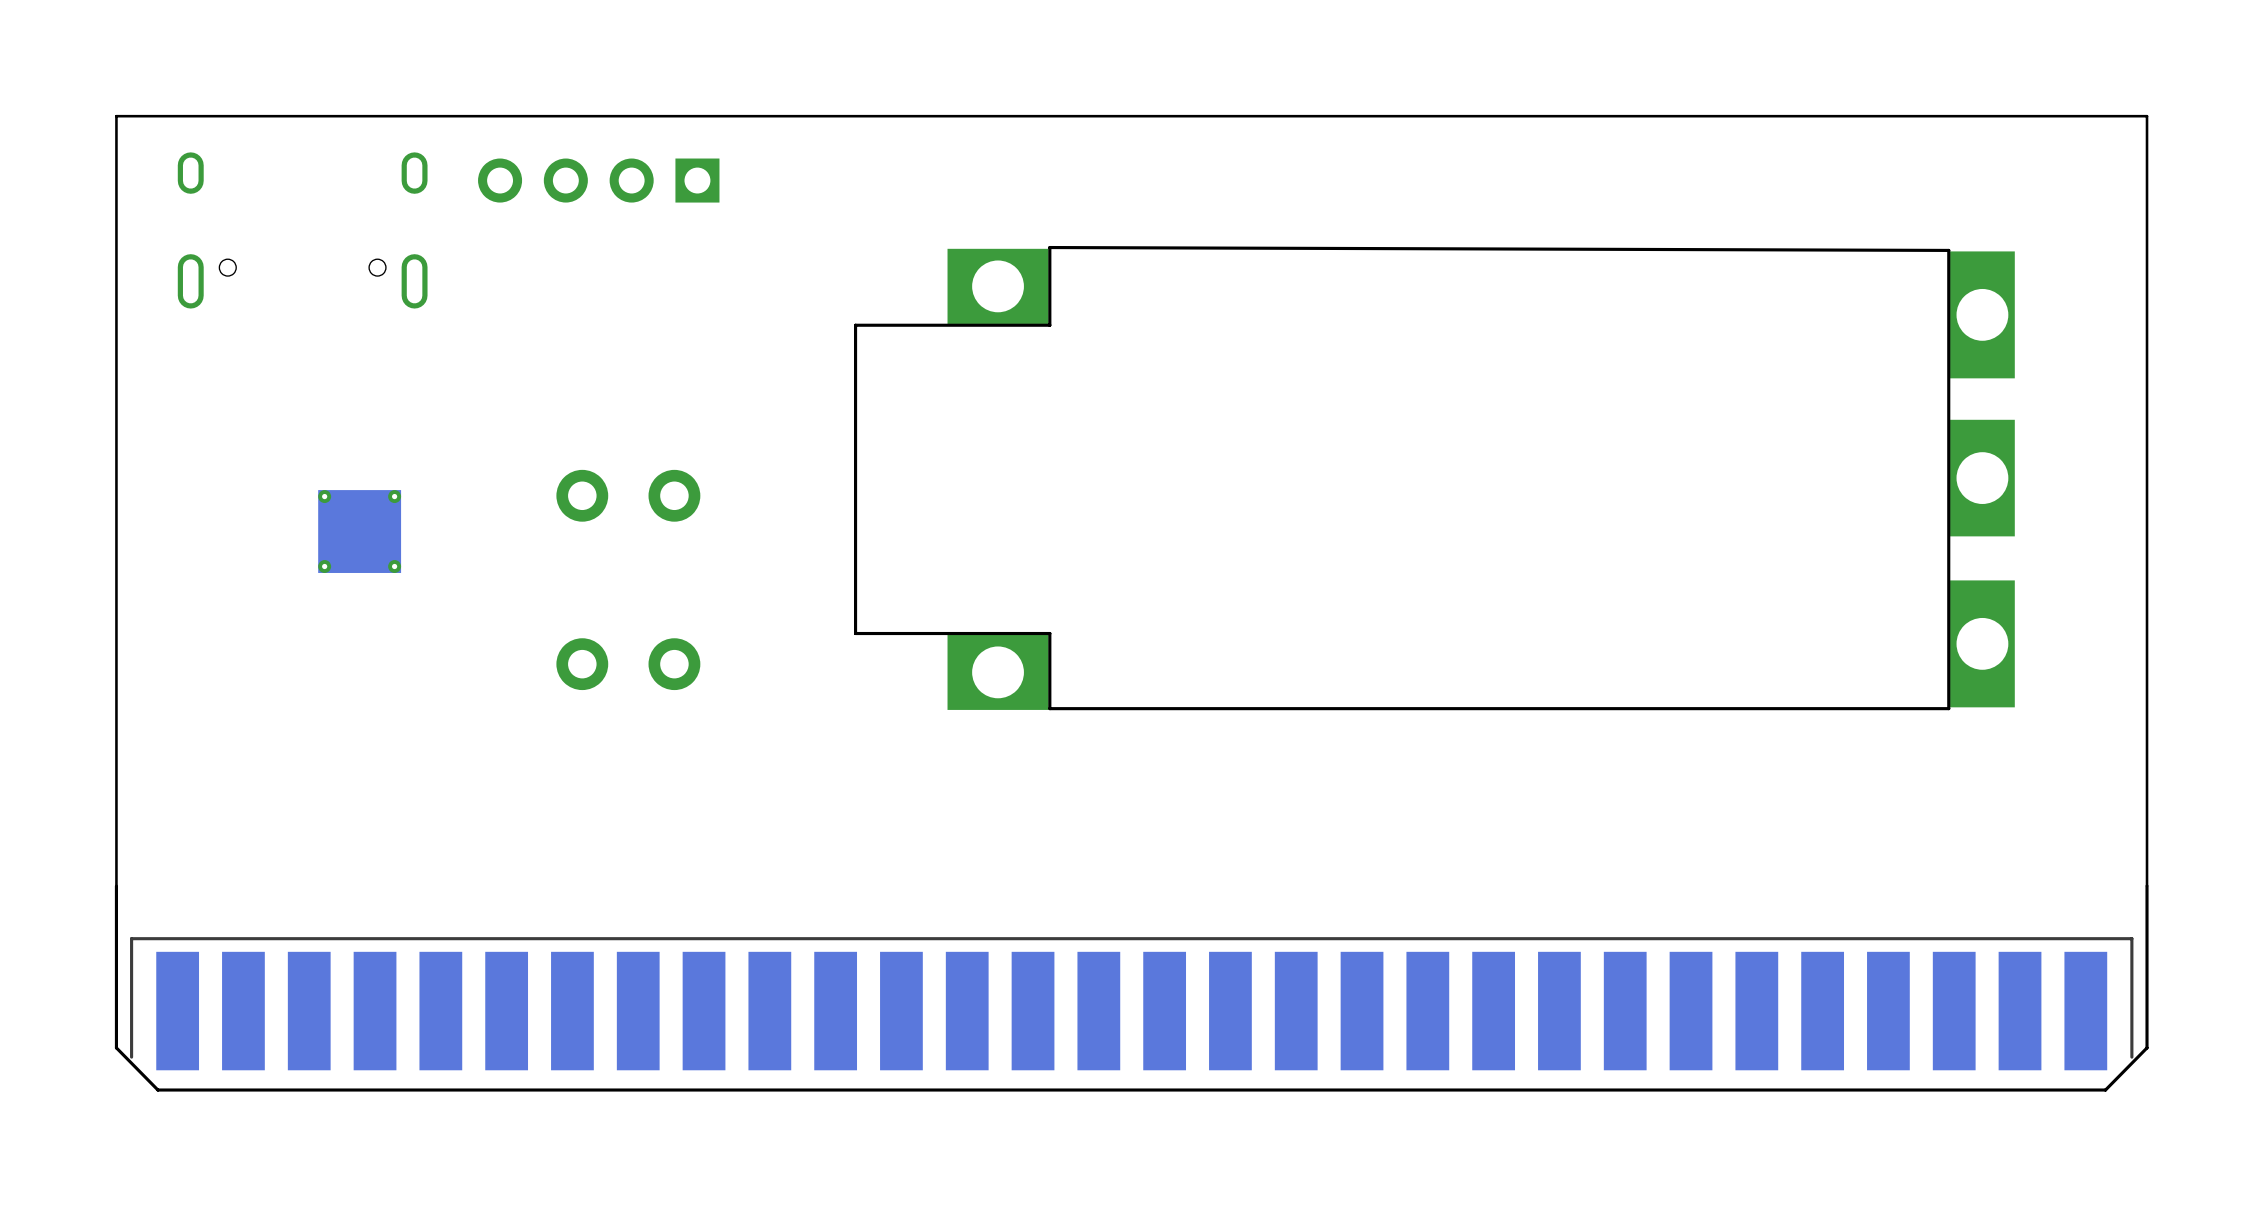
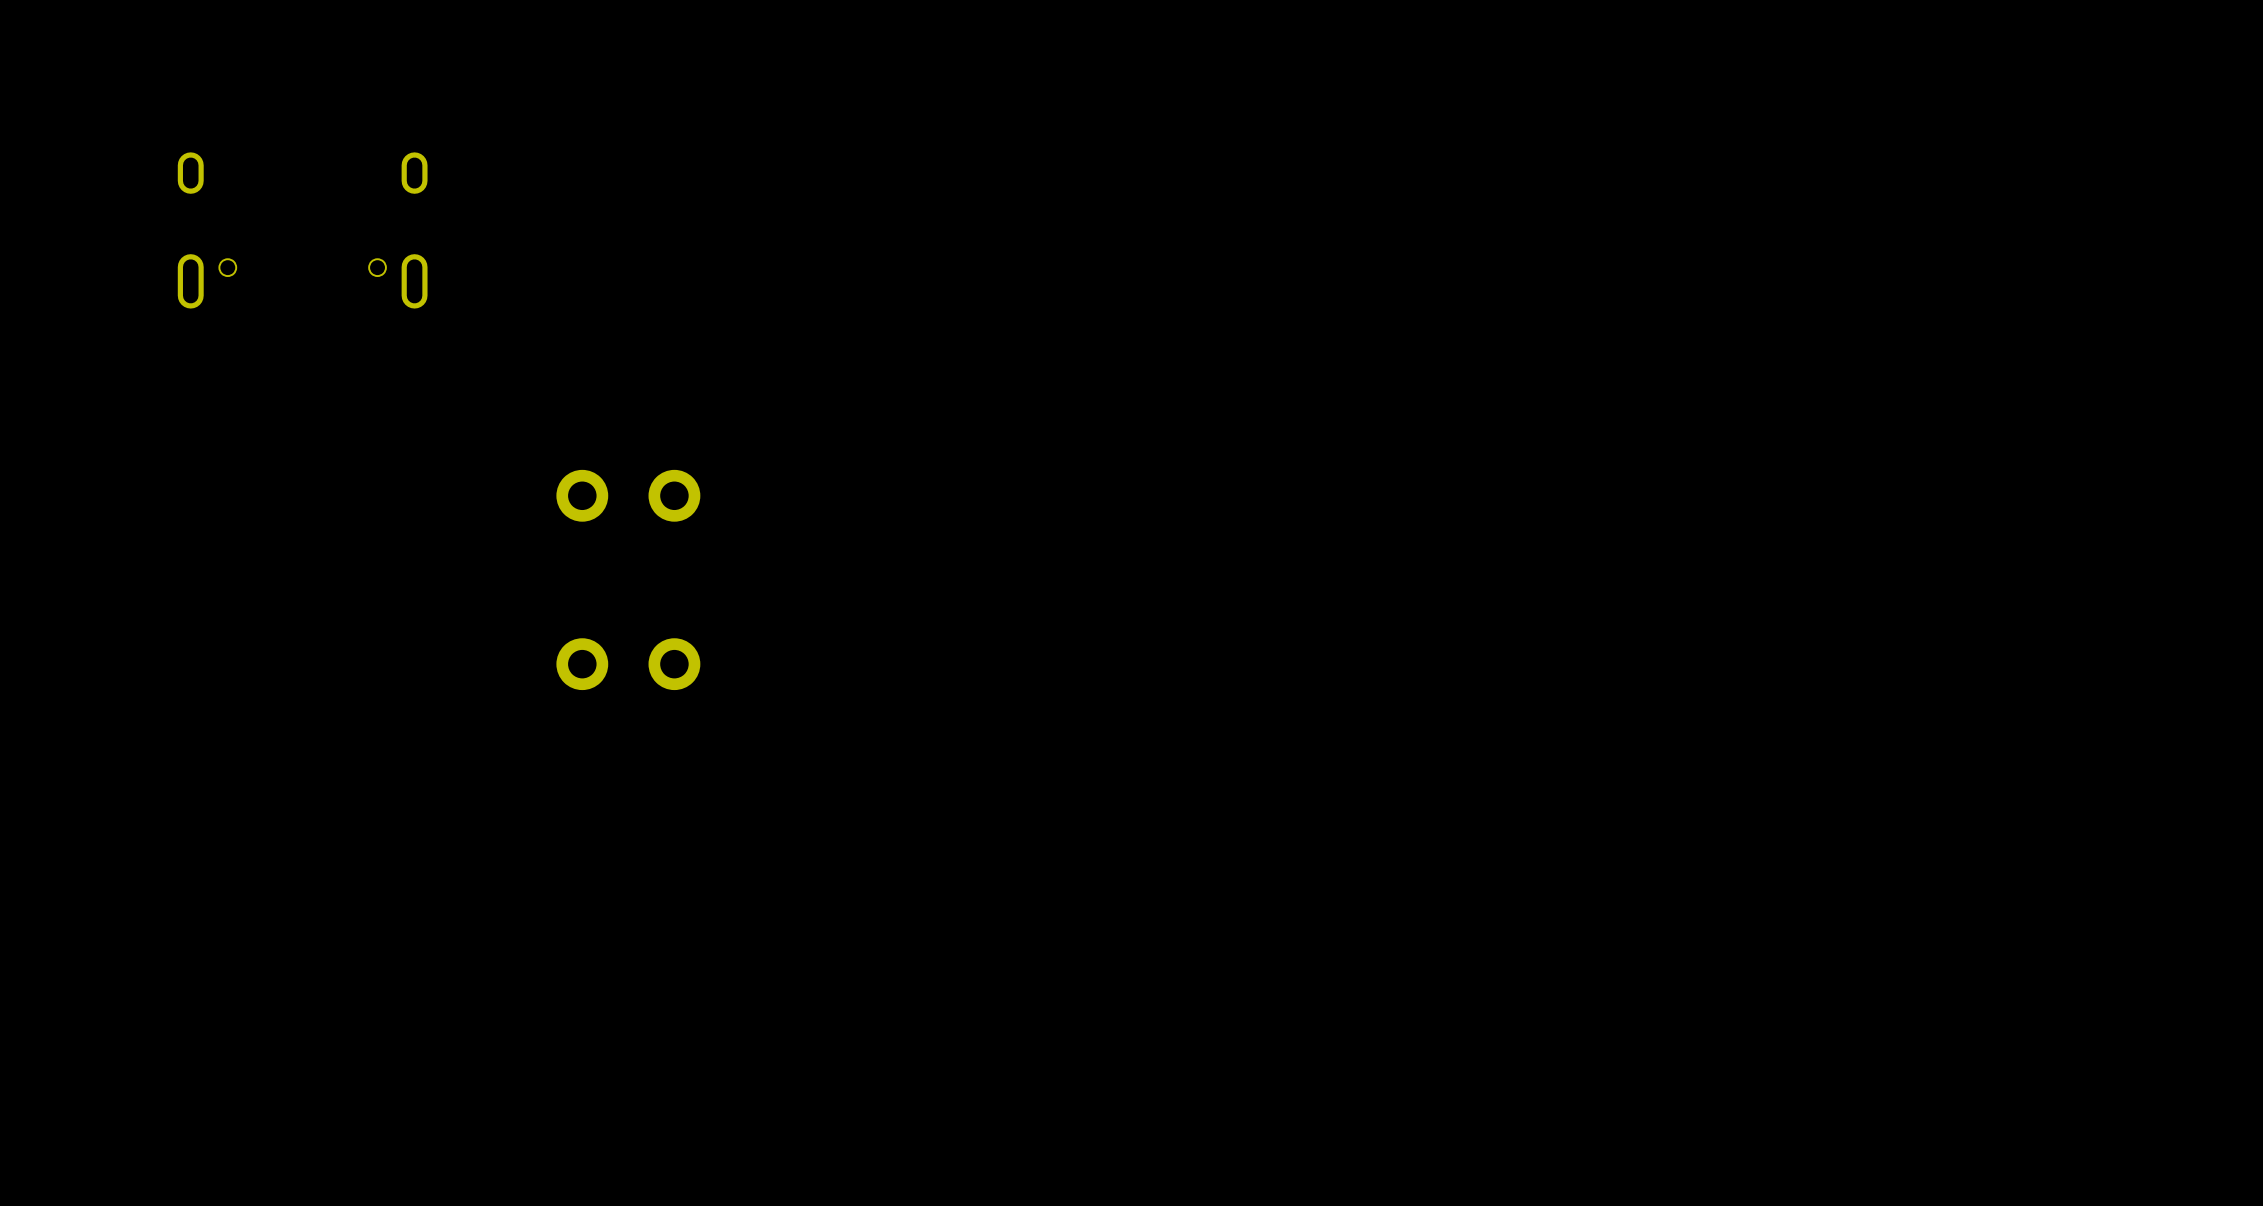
part: (598, 180) -> none
part: (1434, 478) -> none
part: (359, 531) -> none
board edge: (2147, 886) (2147, 116) (116, 116) (116, 886) -> none
part: (1131, 988) -> none

